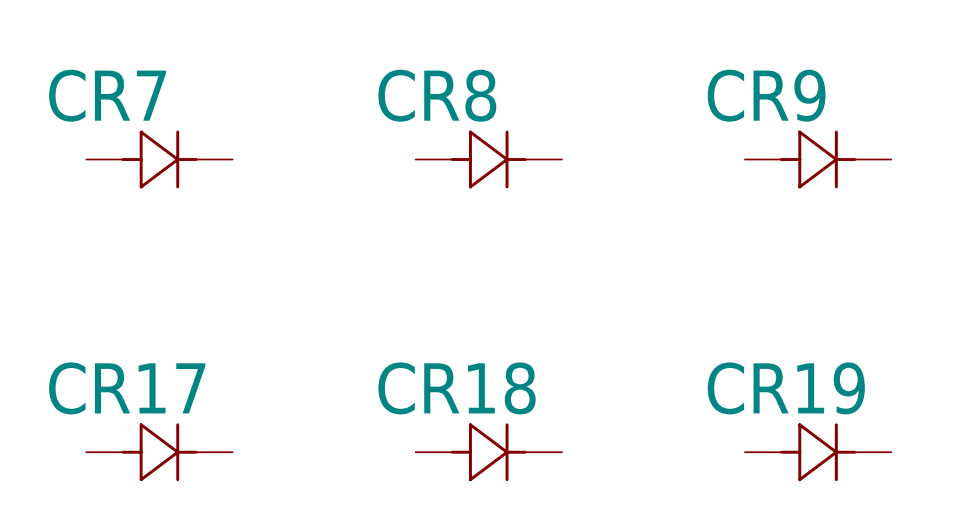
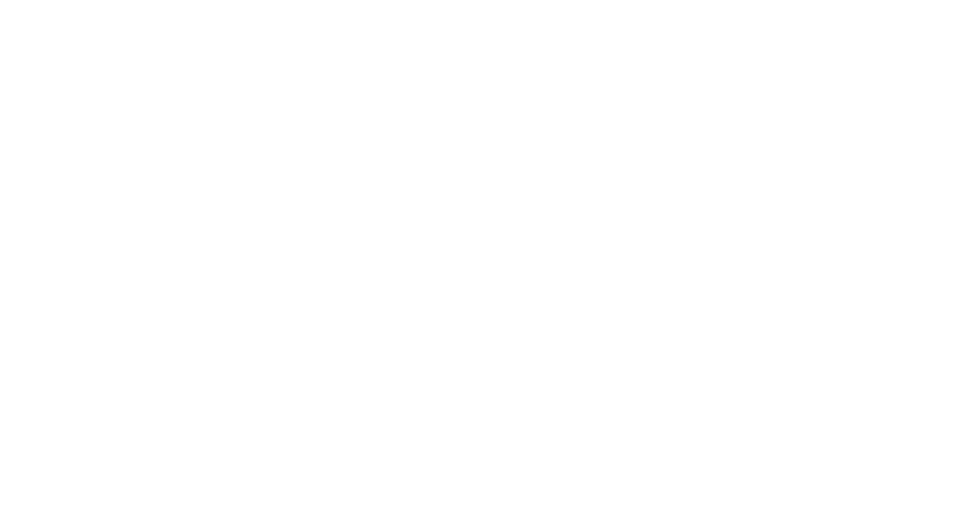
CR7: (159, 159) -> none
CR8: (488, 159) -> none
CR9: (818, 159) -> none
CR17: (159, 452) -> none
CR18: (488, 452) -> none
CR19: (818, 452) -> none

